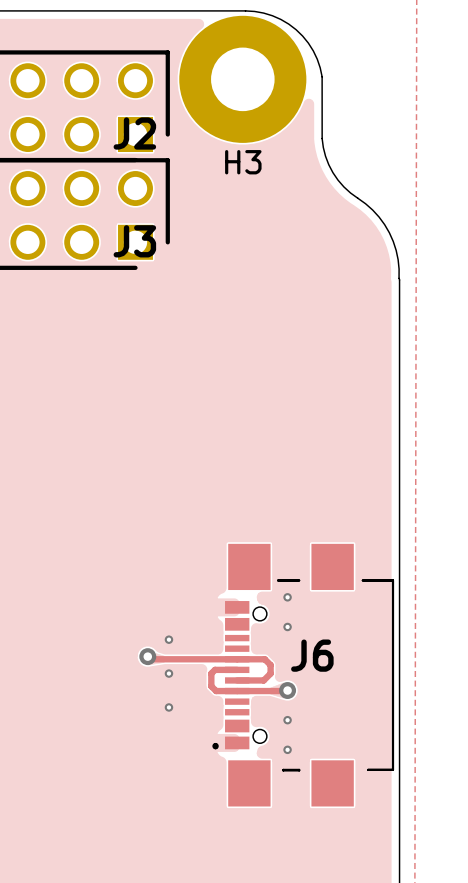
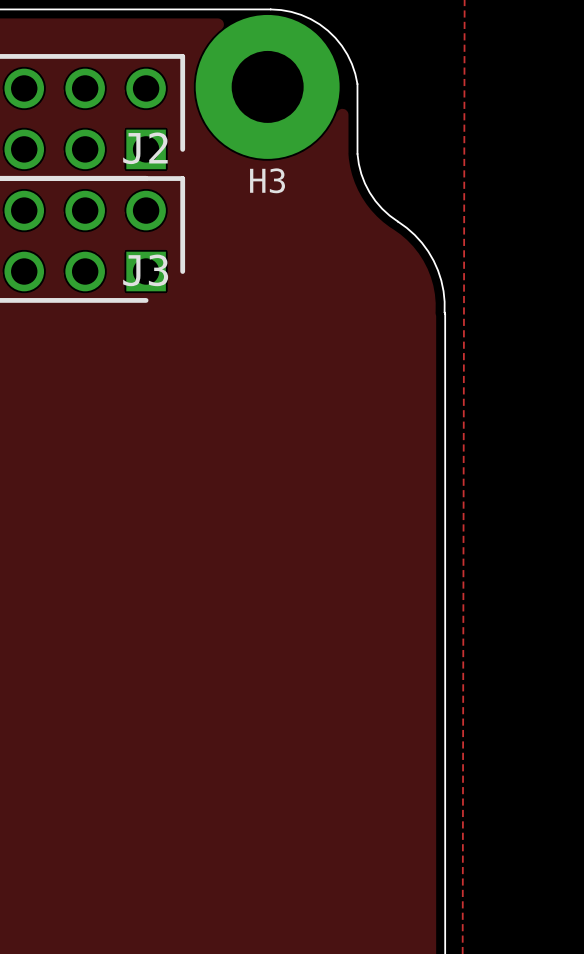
via: (287, 597) -> none
via: (287, 626) -> none
via: (168, 639) -> none
track: (147, 656) (150, 659) (264, 659) (270, 665) (270, 673) (263, 680) (237, 680) -> none
via: (147, 656) -> none
track: (237, 669) (215, 669) (211, 673) (211, 686) (216, 691) (287, 690) -> none
via: (168, 673) -> none
J6: (303, 675) -> none
via: (287, 690) -> none
via: (168, 707) -> none
via: (287, 720) -> none
via: (287, 749) -> none

